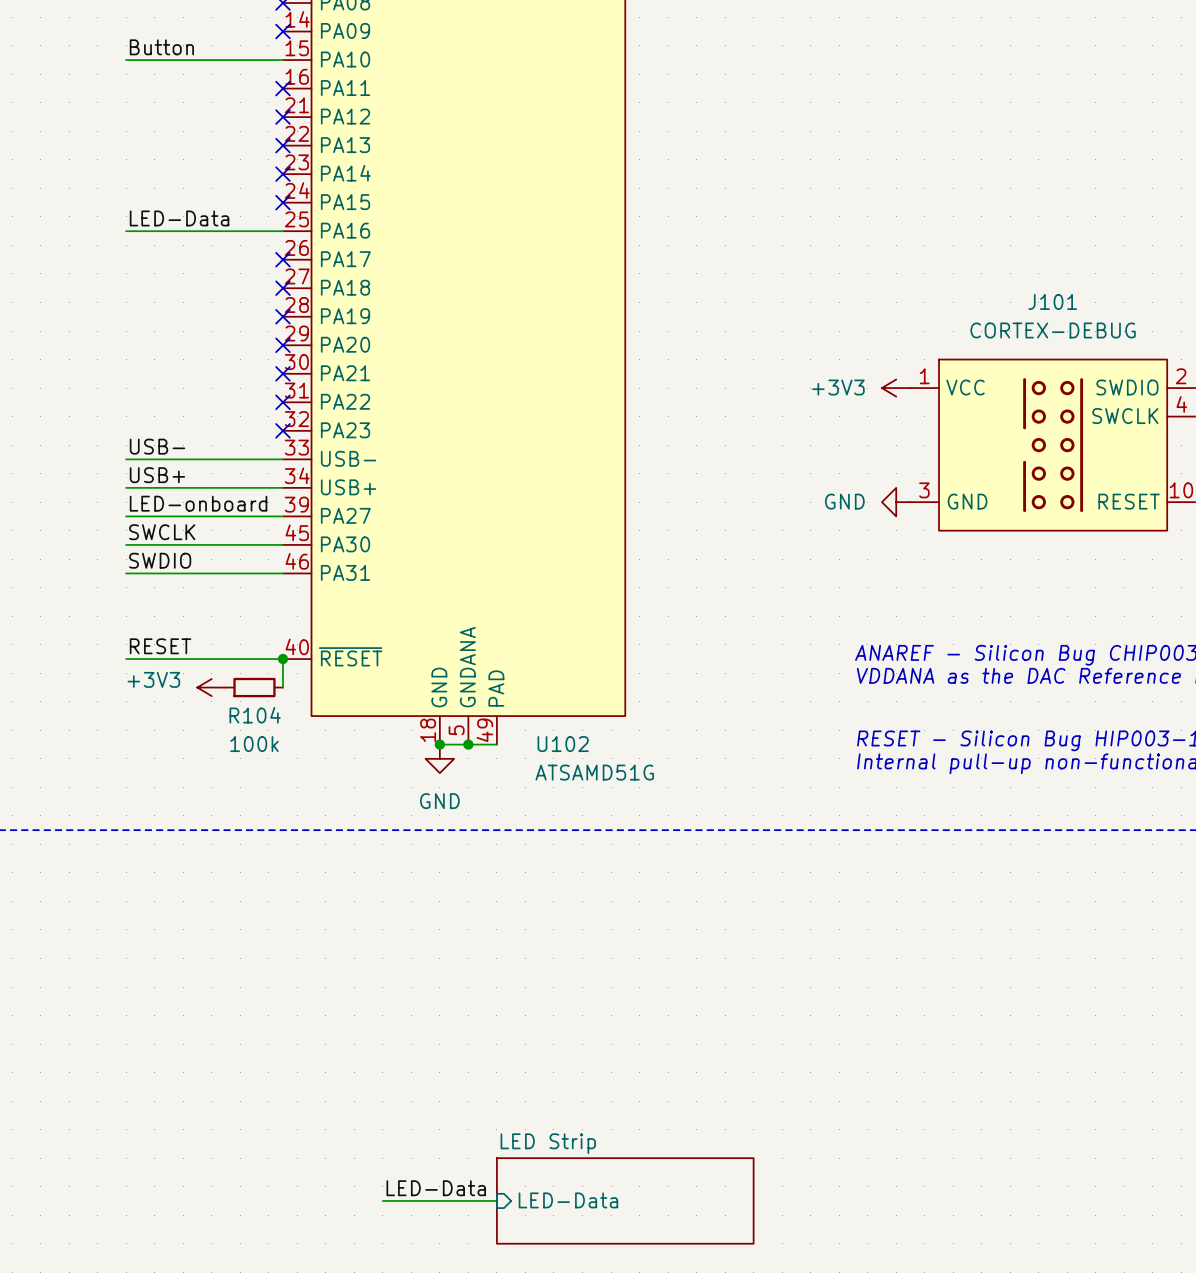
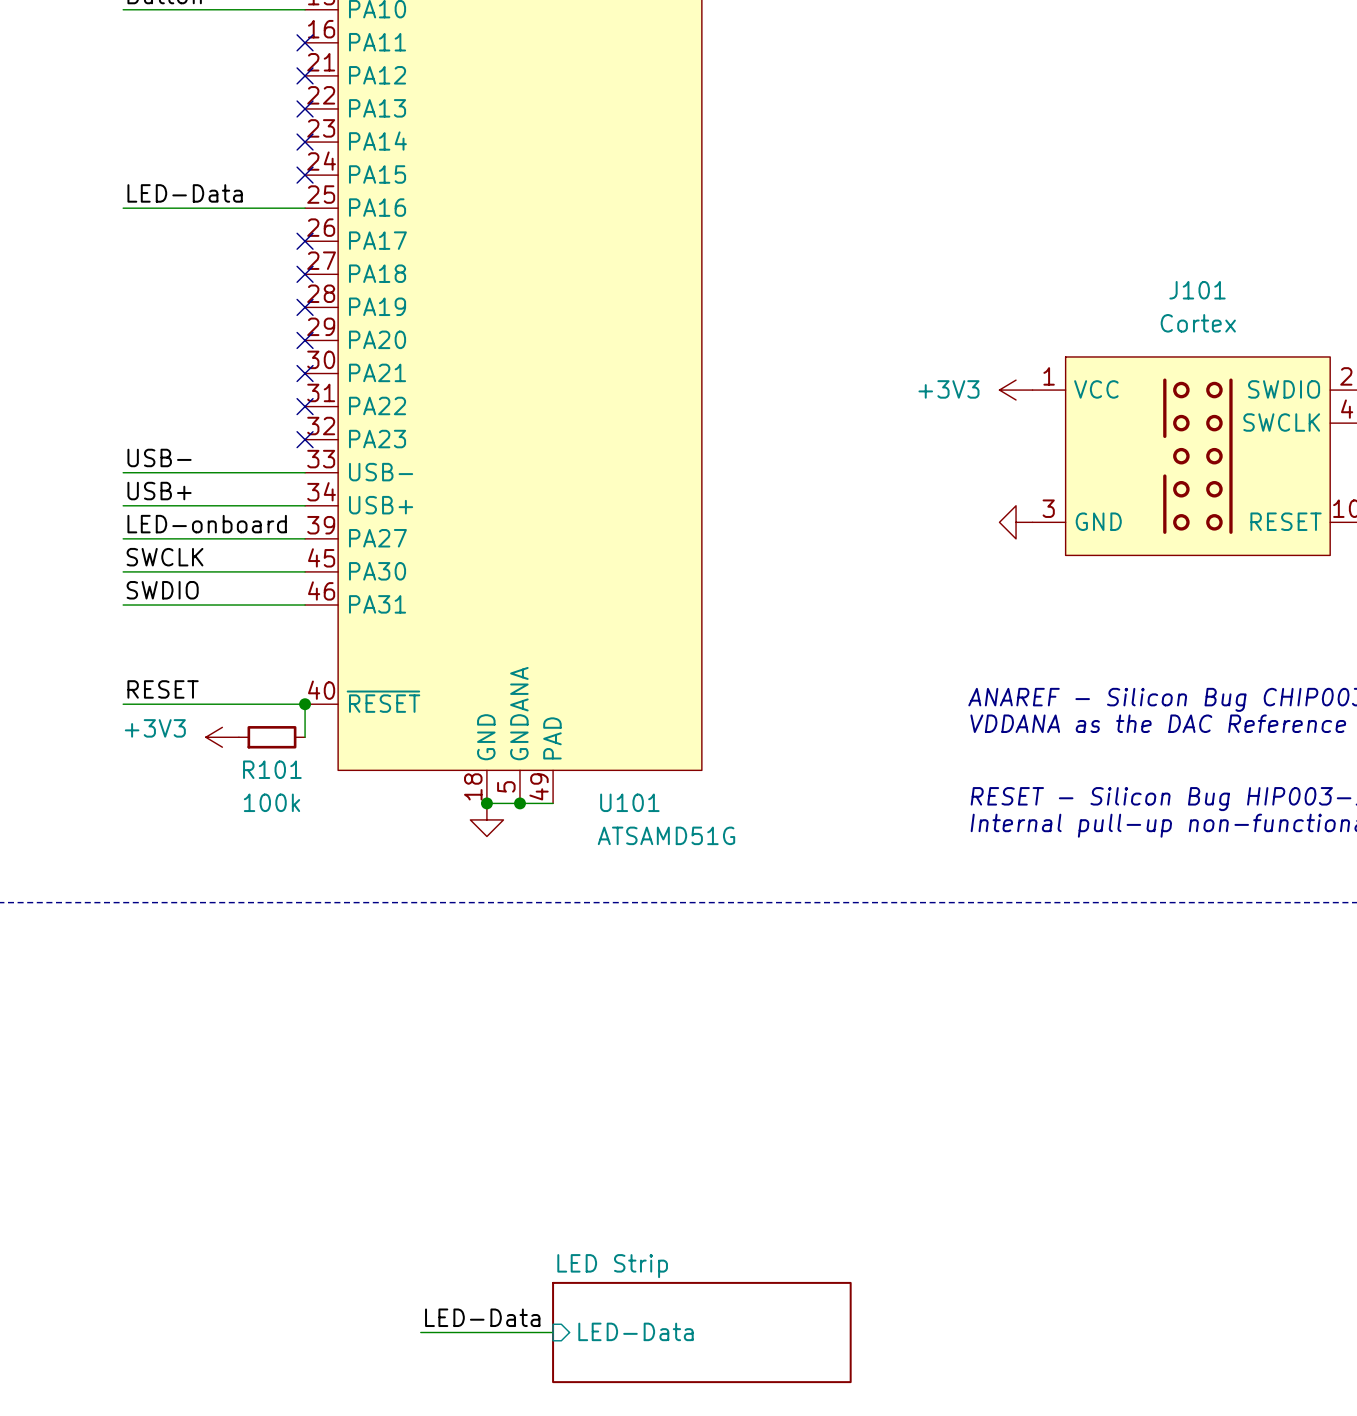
J101 value: CORTEX-DEBUG (1053, 330) -> Cortex (1198, 323)
power symbol text: GND (844, 501) -> none
R104 name: R104 (255, 715) -> R101 (272, 769)
U102 name: U102 (563, 744) -> U101 (629, 802)
power symbol text: GND (439, 801) -> none

